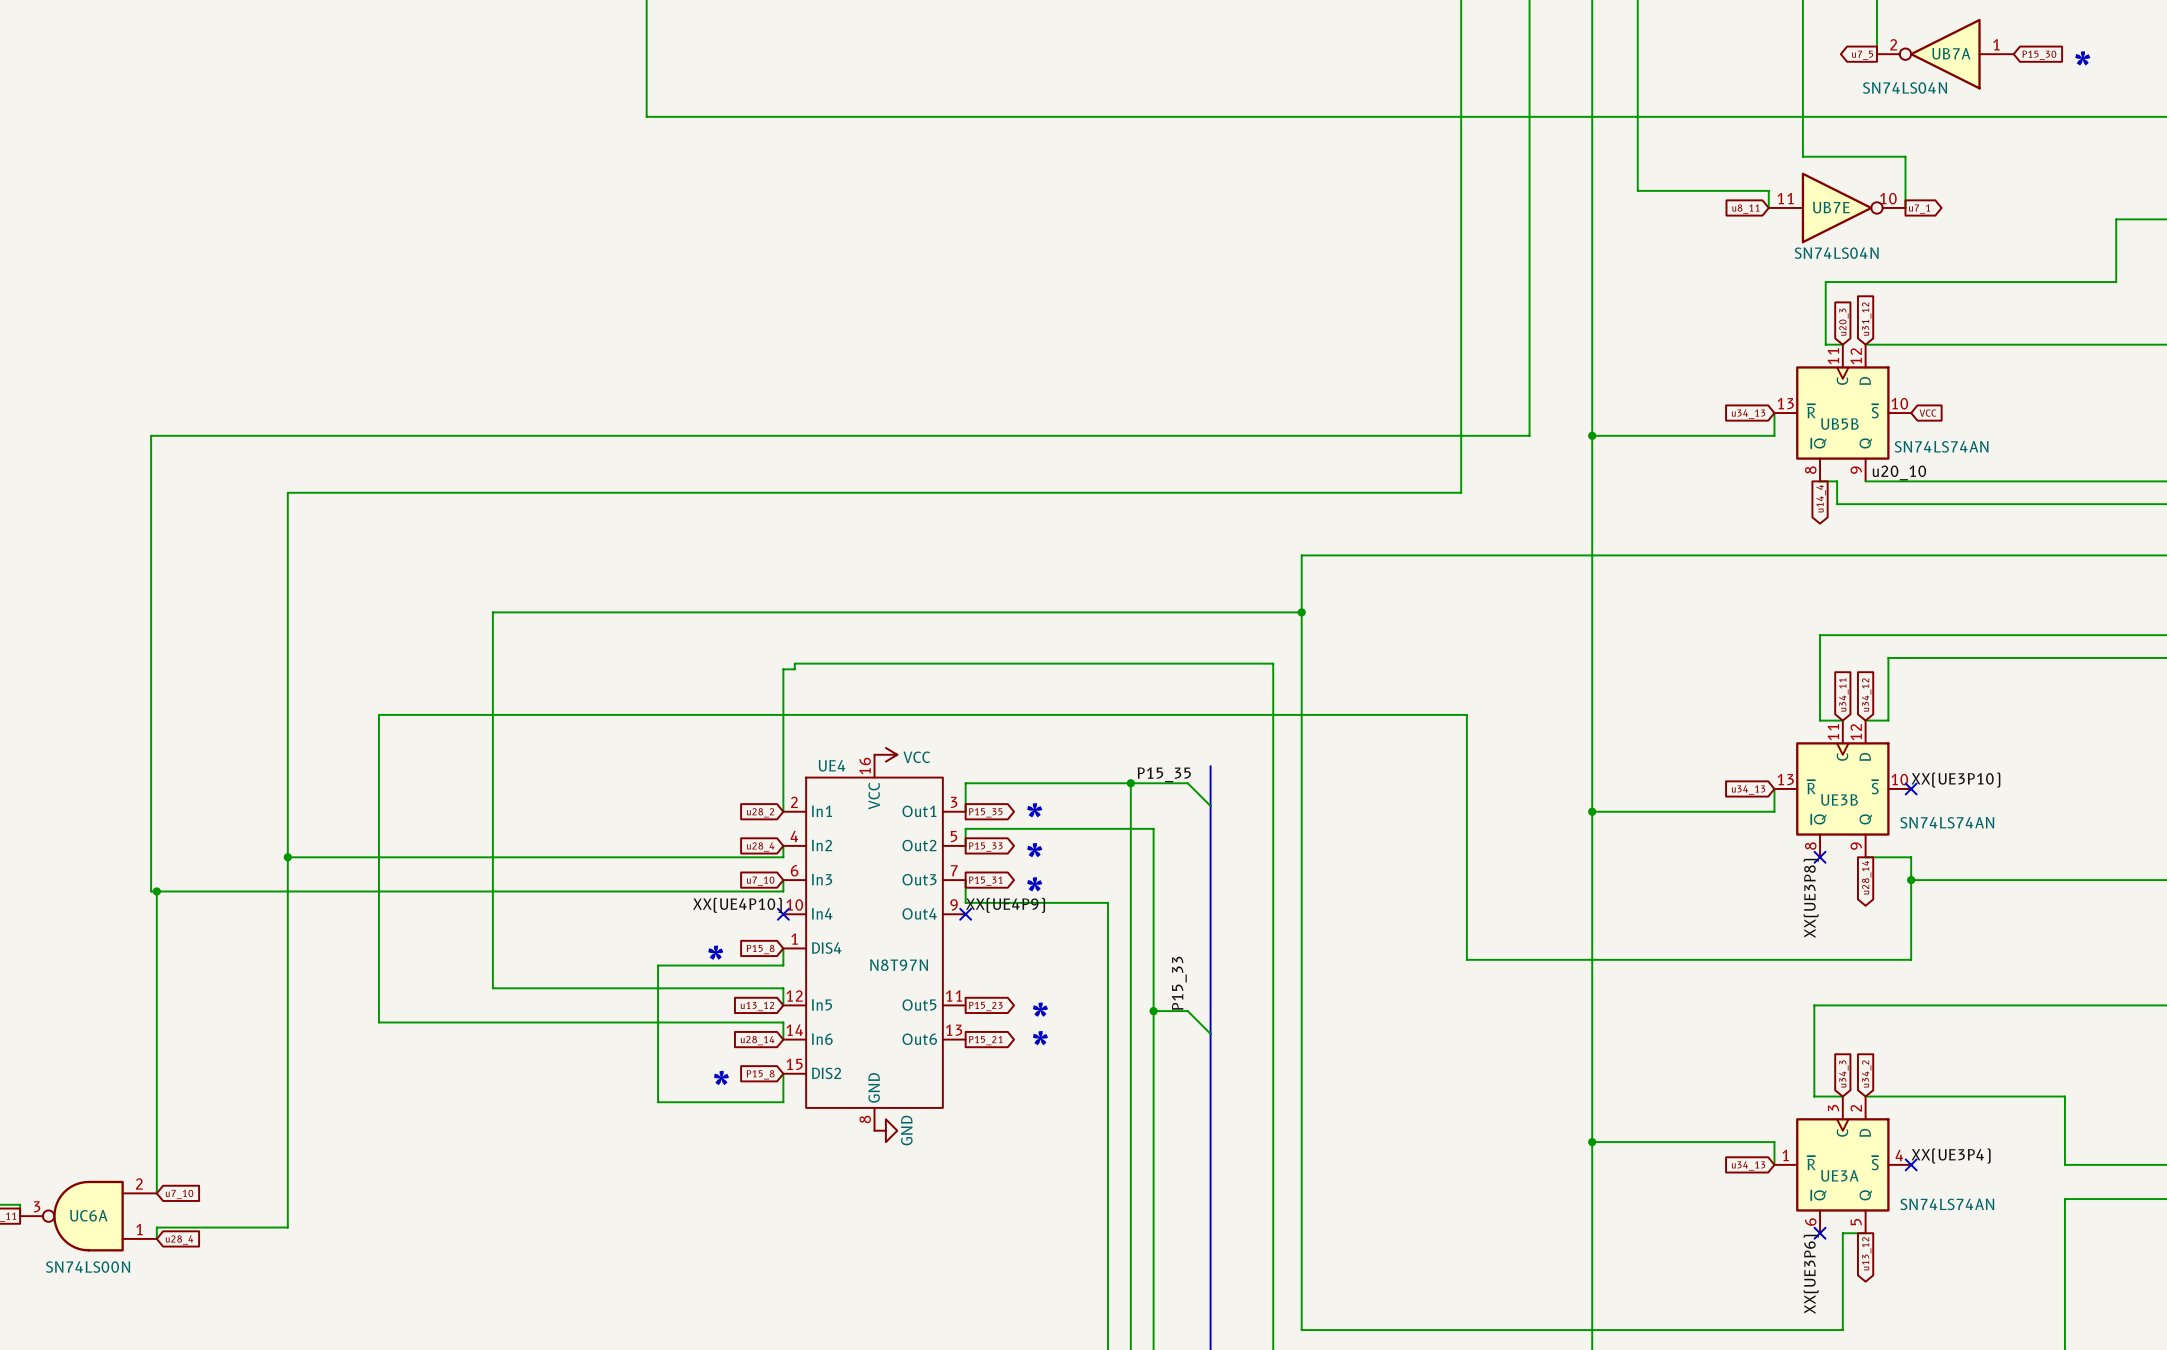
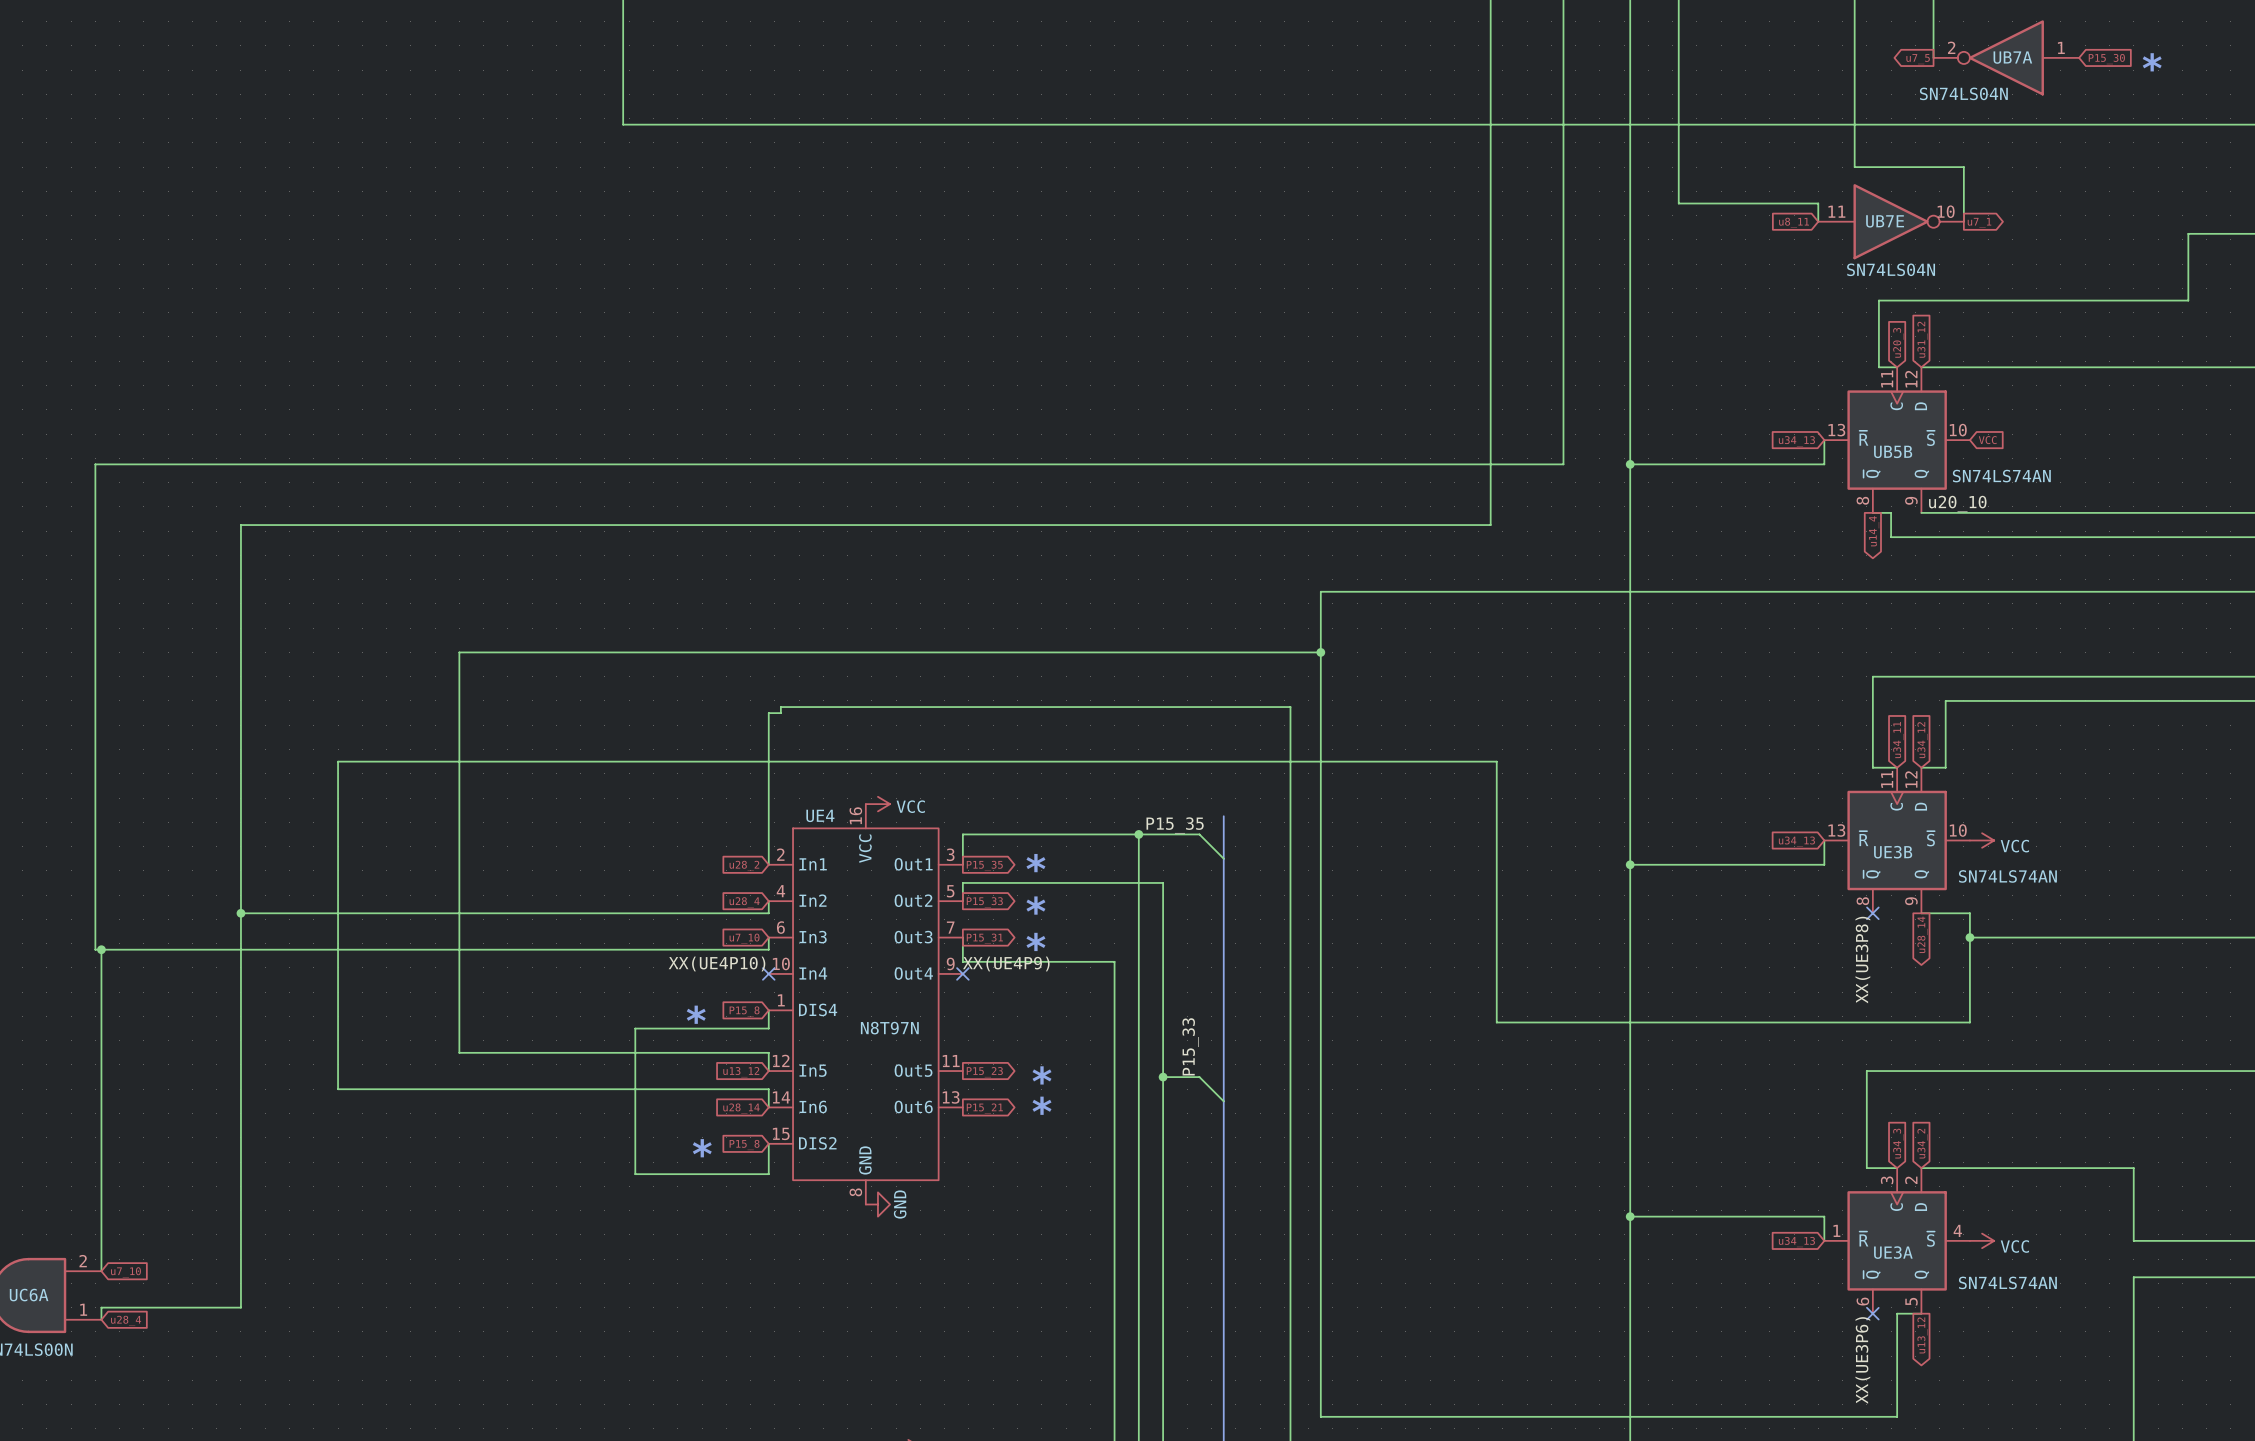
label: XX(UE3P10) (1955, 780) -> none
no-connect mark: (1911, 788) -> none
power symbol: none -> VCC (1982, 840)
label: XX(UE3P4) (1951, 1156) -> none
no-connect mark: (1911, 1164) -> none
power symbol: none -> VCC (1982, 1240)

